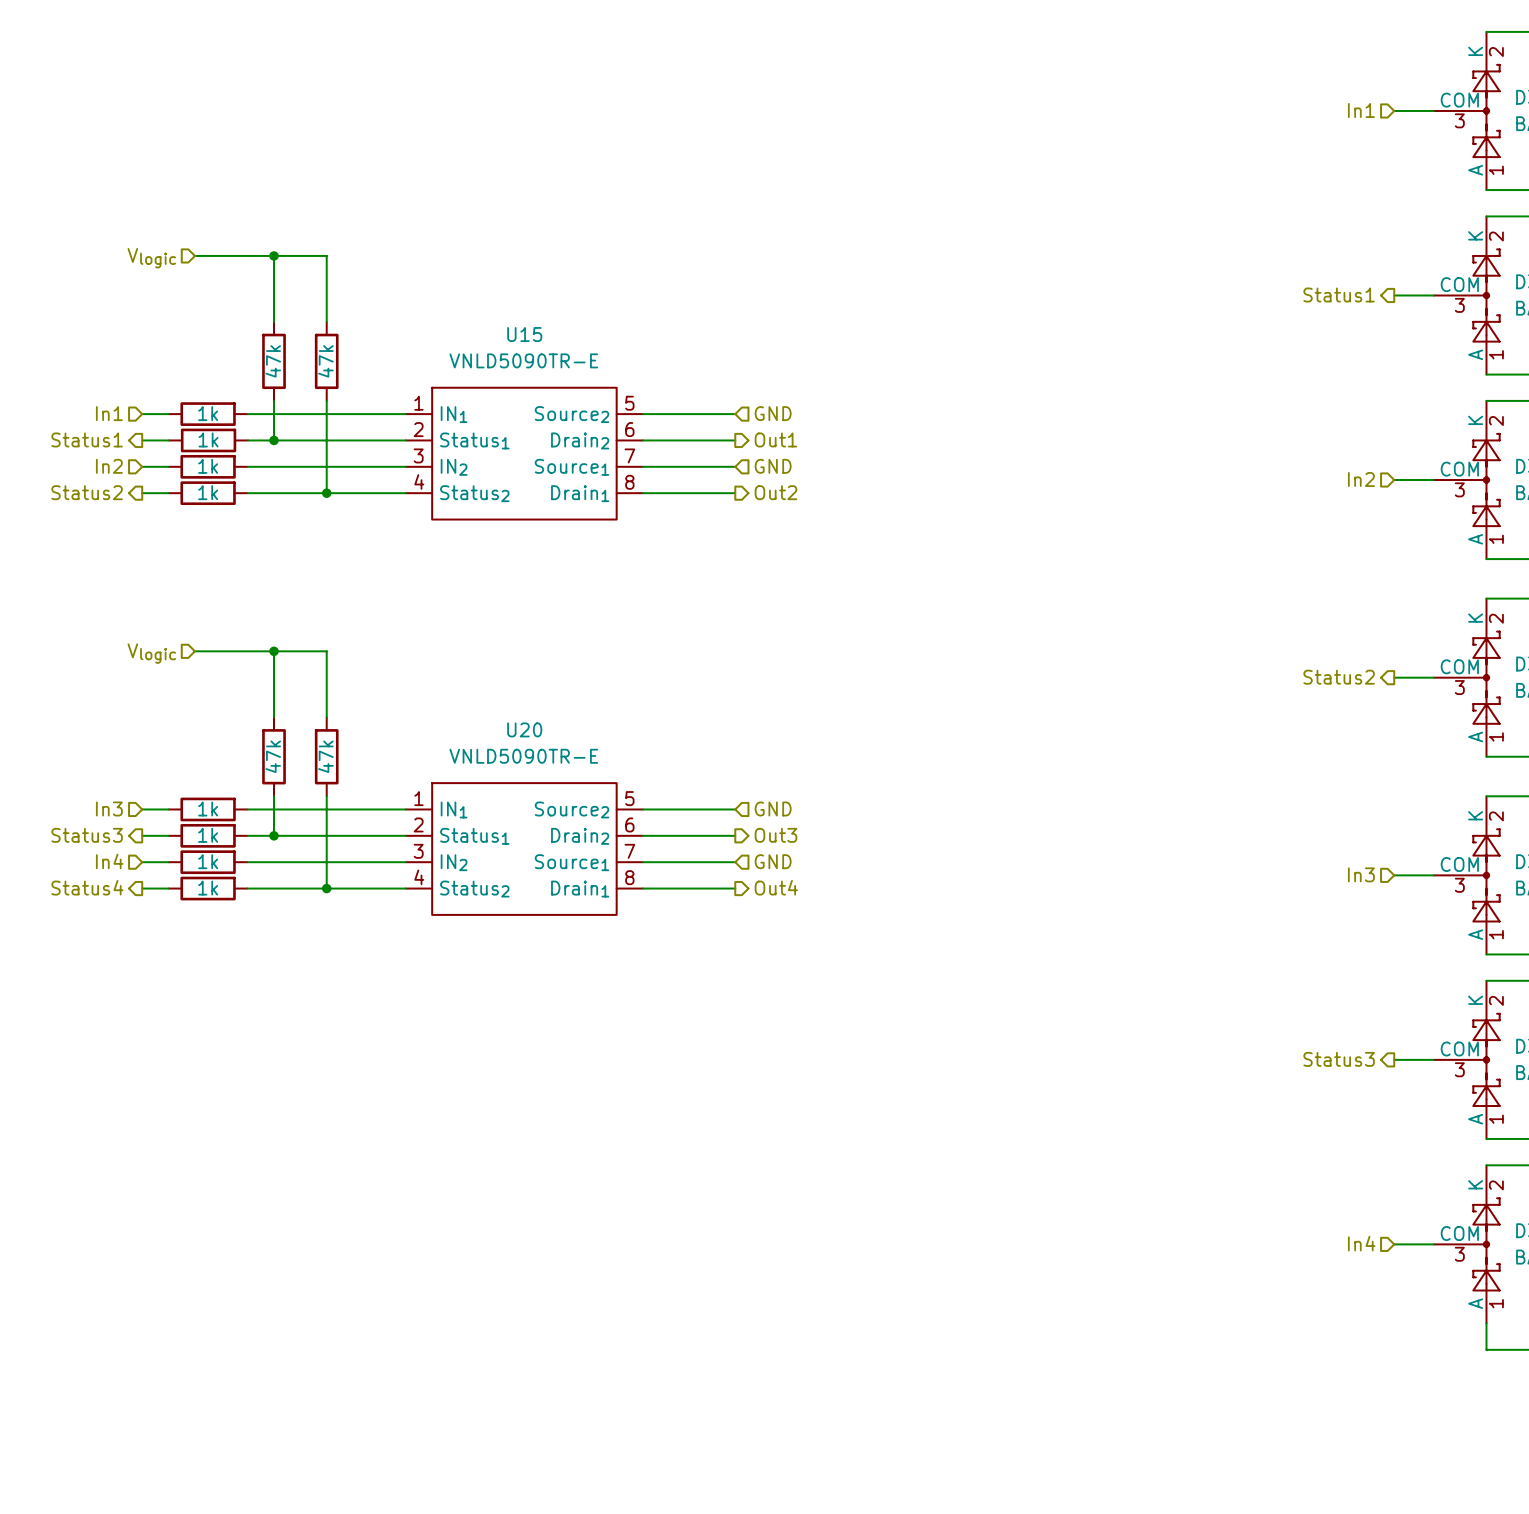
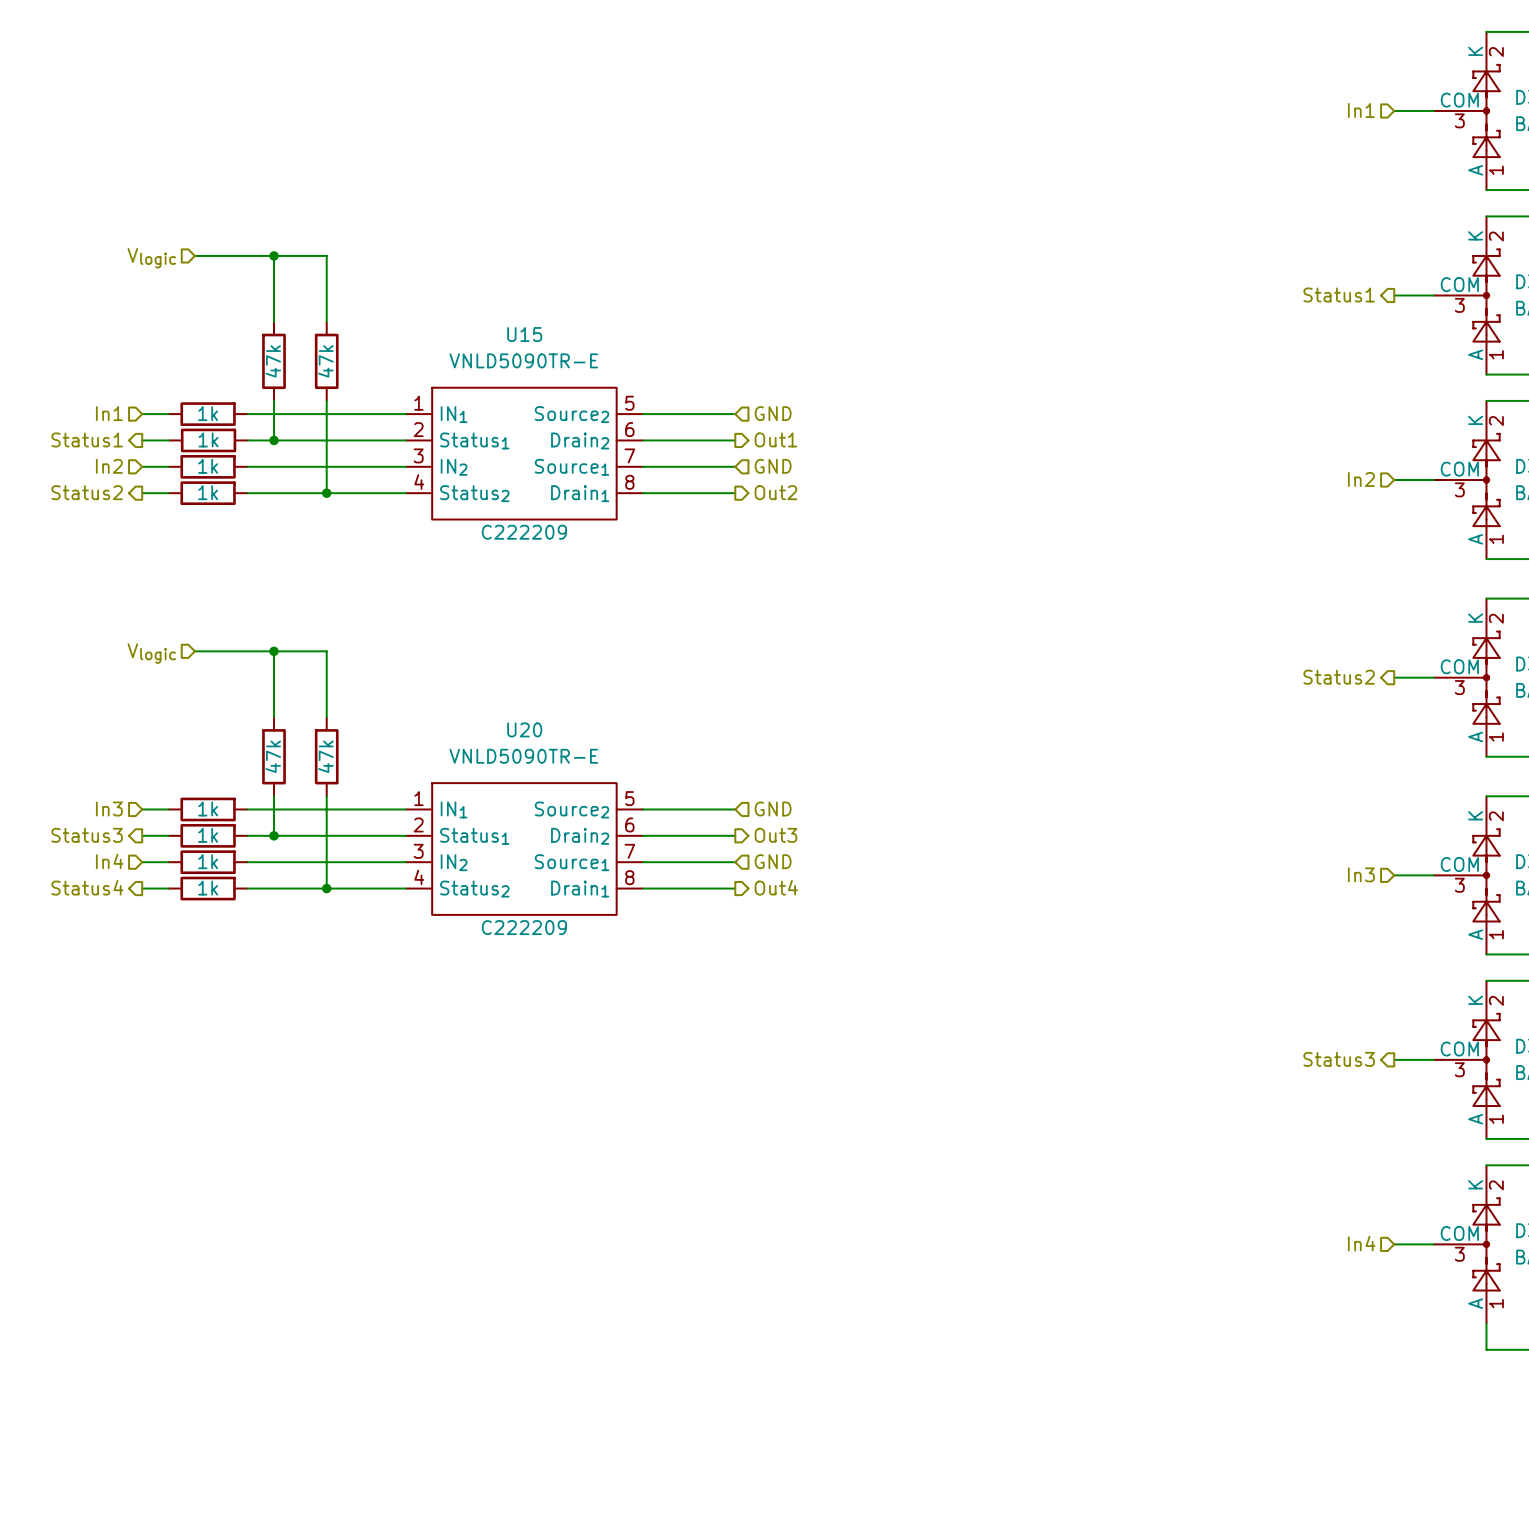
U15 text: none -> C222209 (524, 532)
U20 text: none -> C222209 (524, 927)

